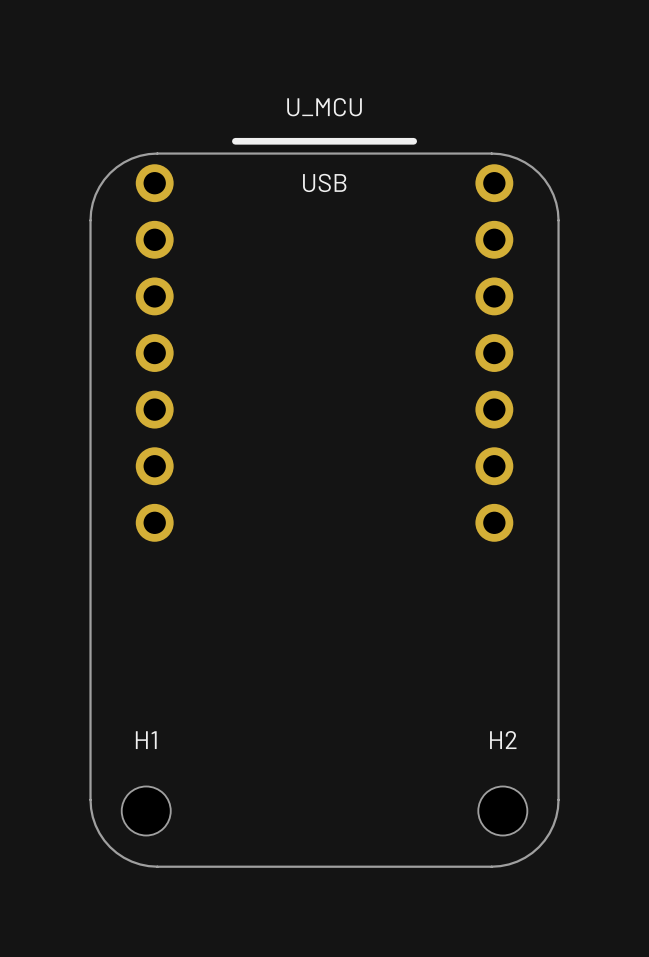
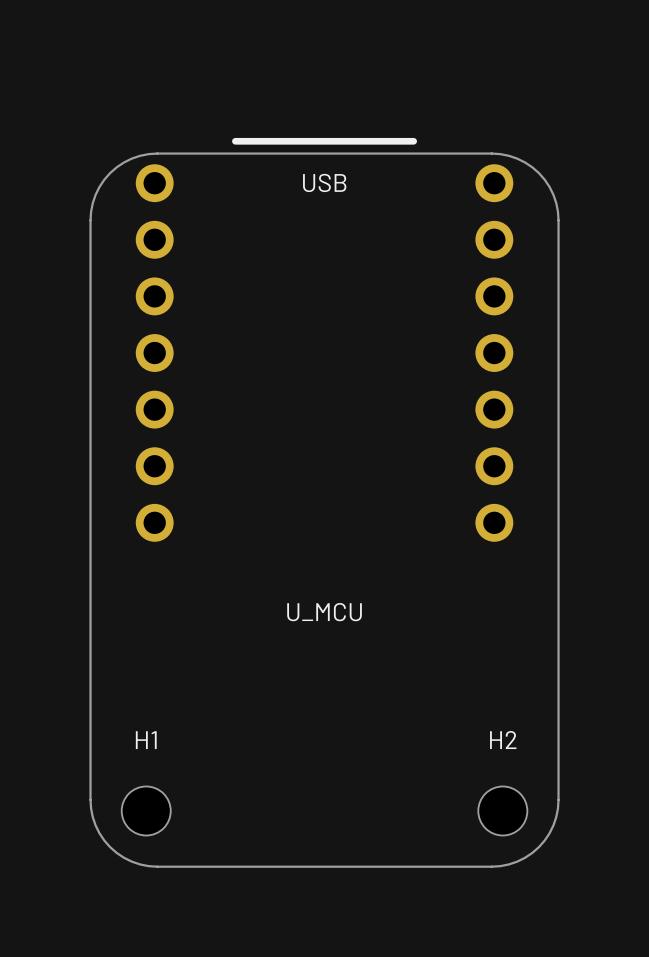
U_MCU name position: U_MCU (324, 107) -> U_MCU (324, 612)

